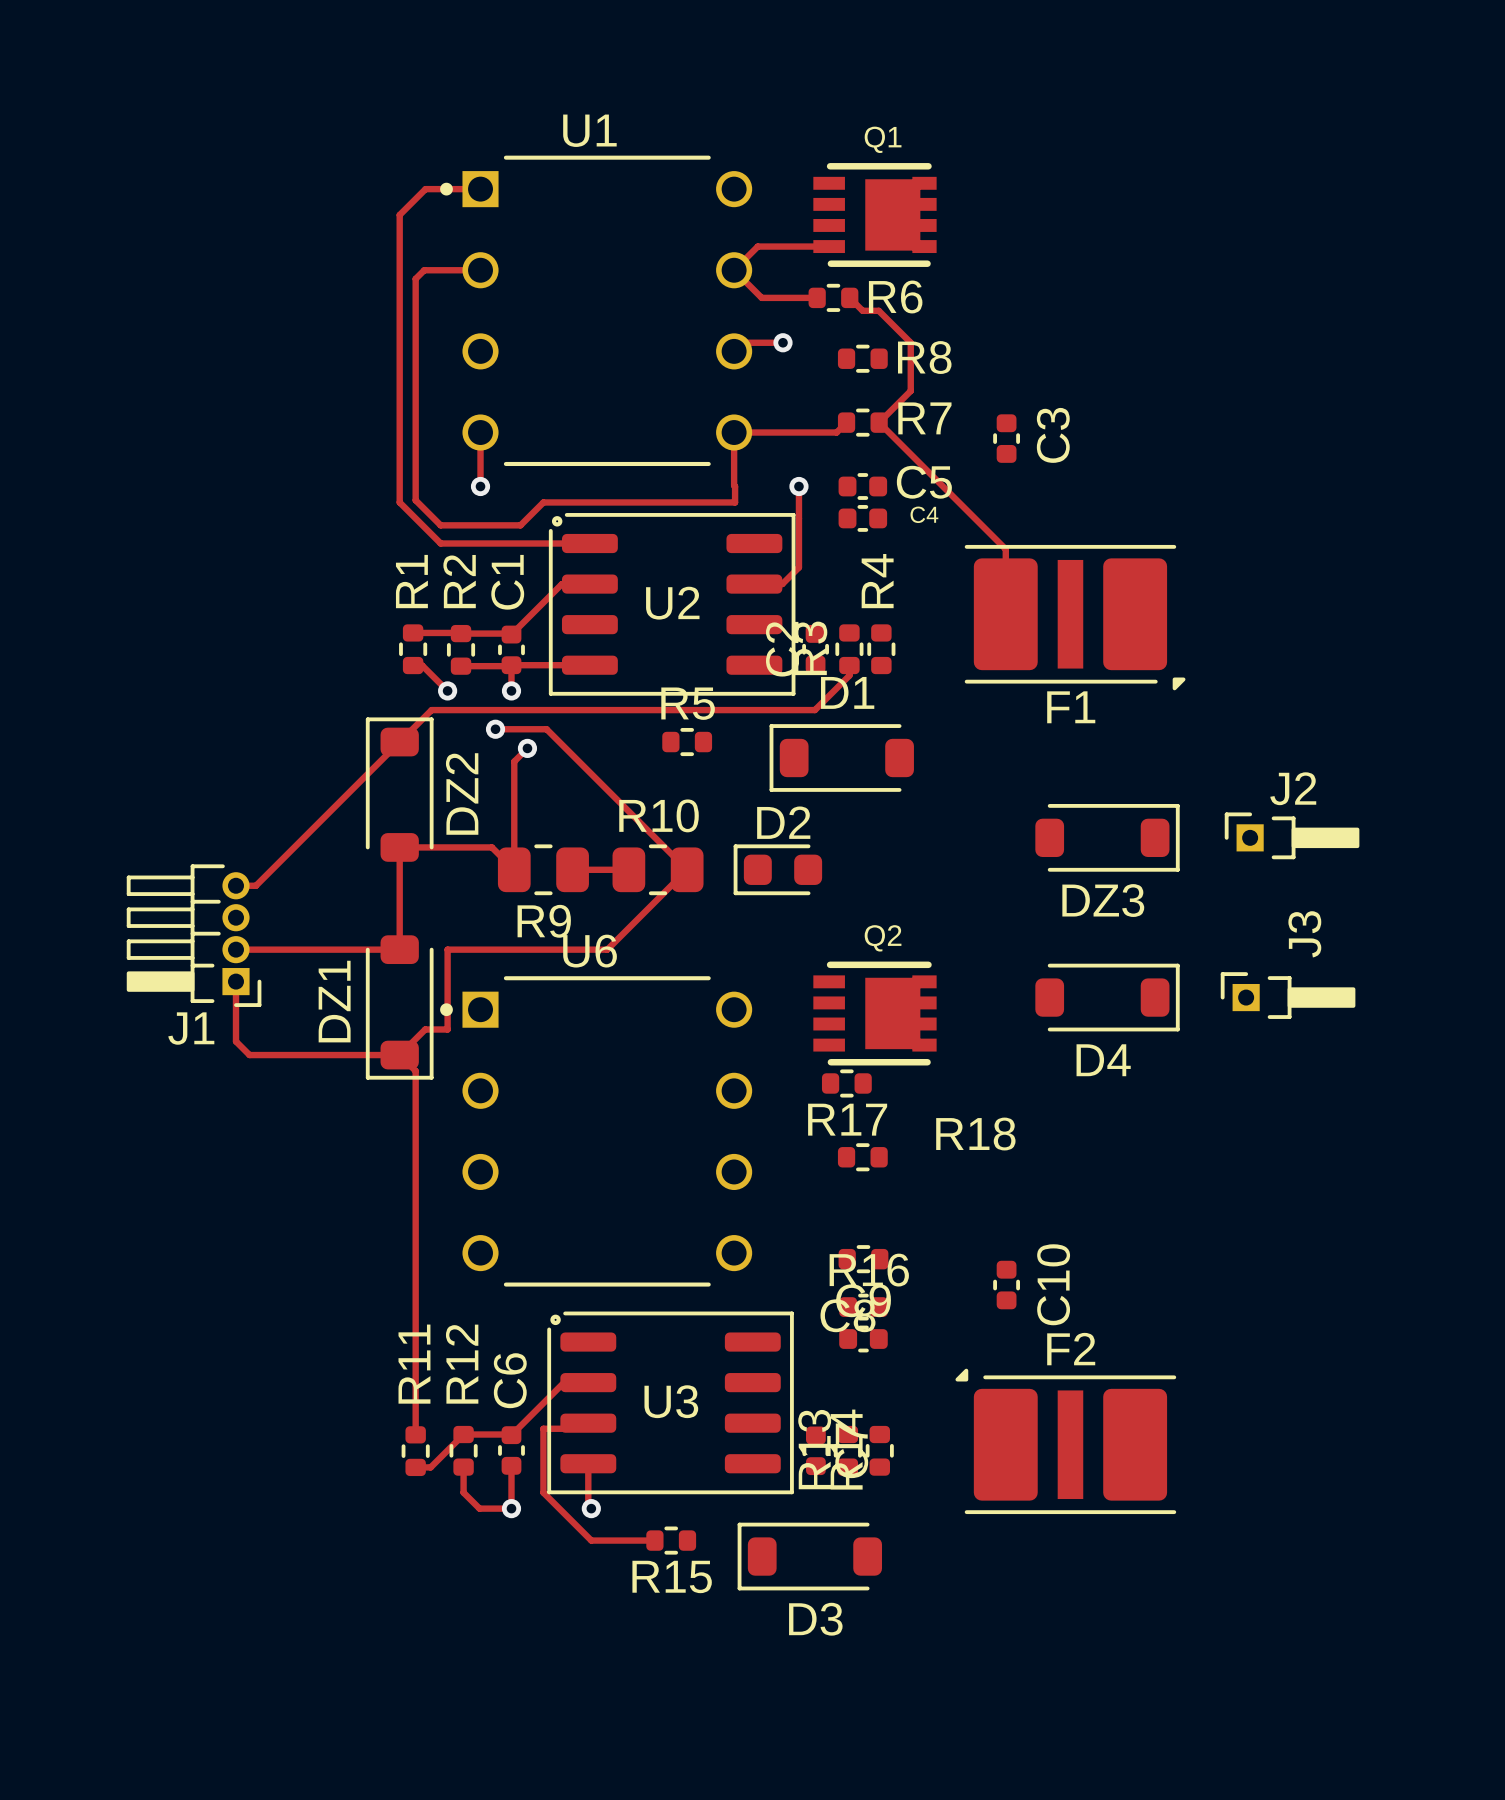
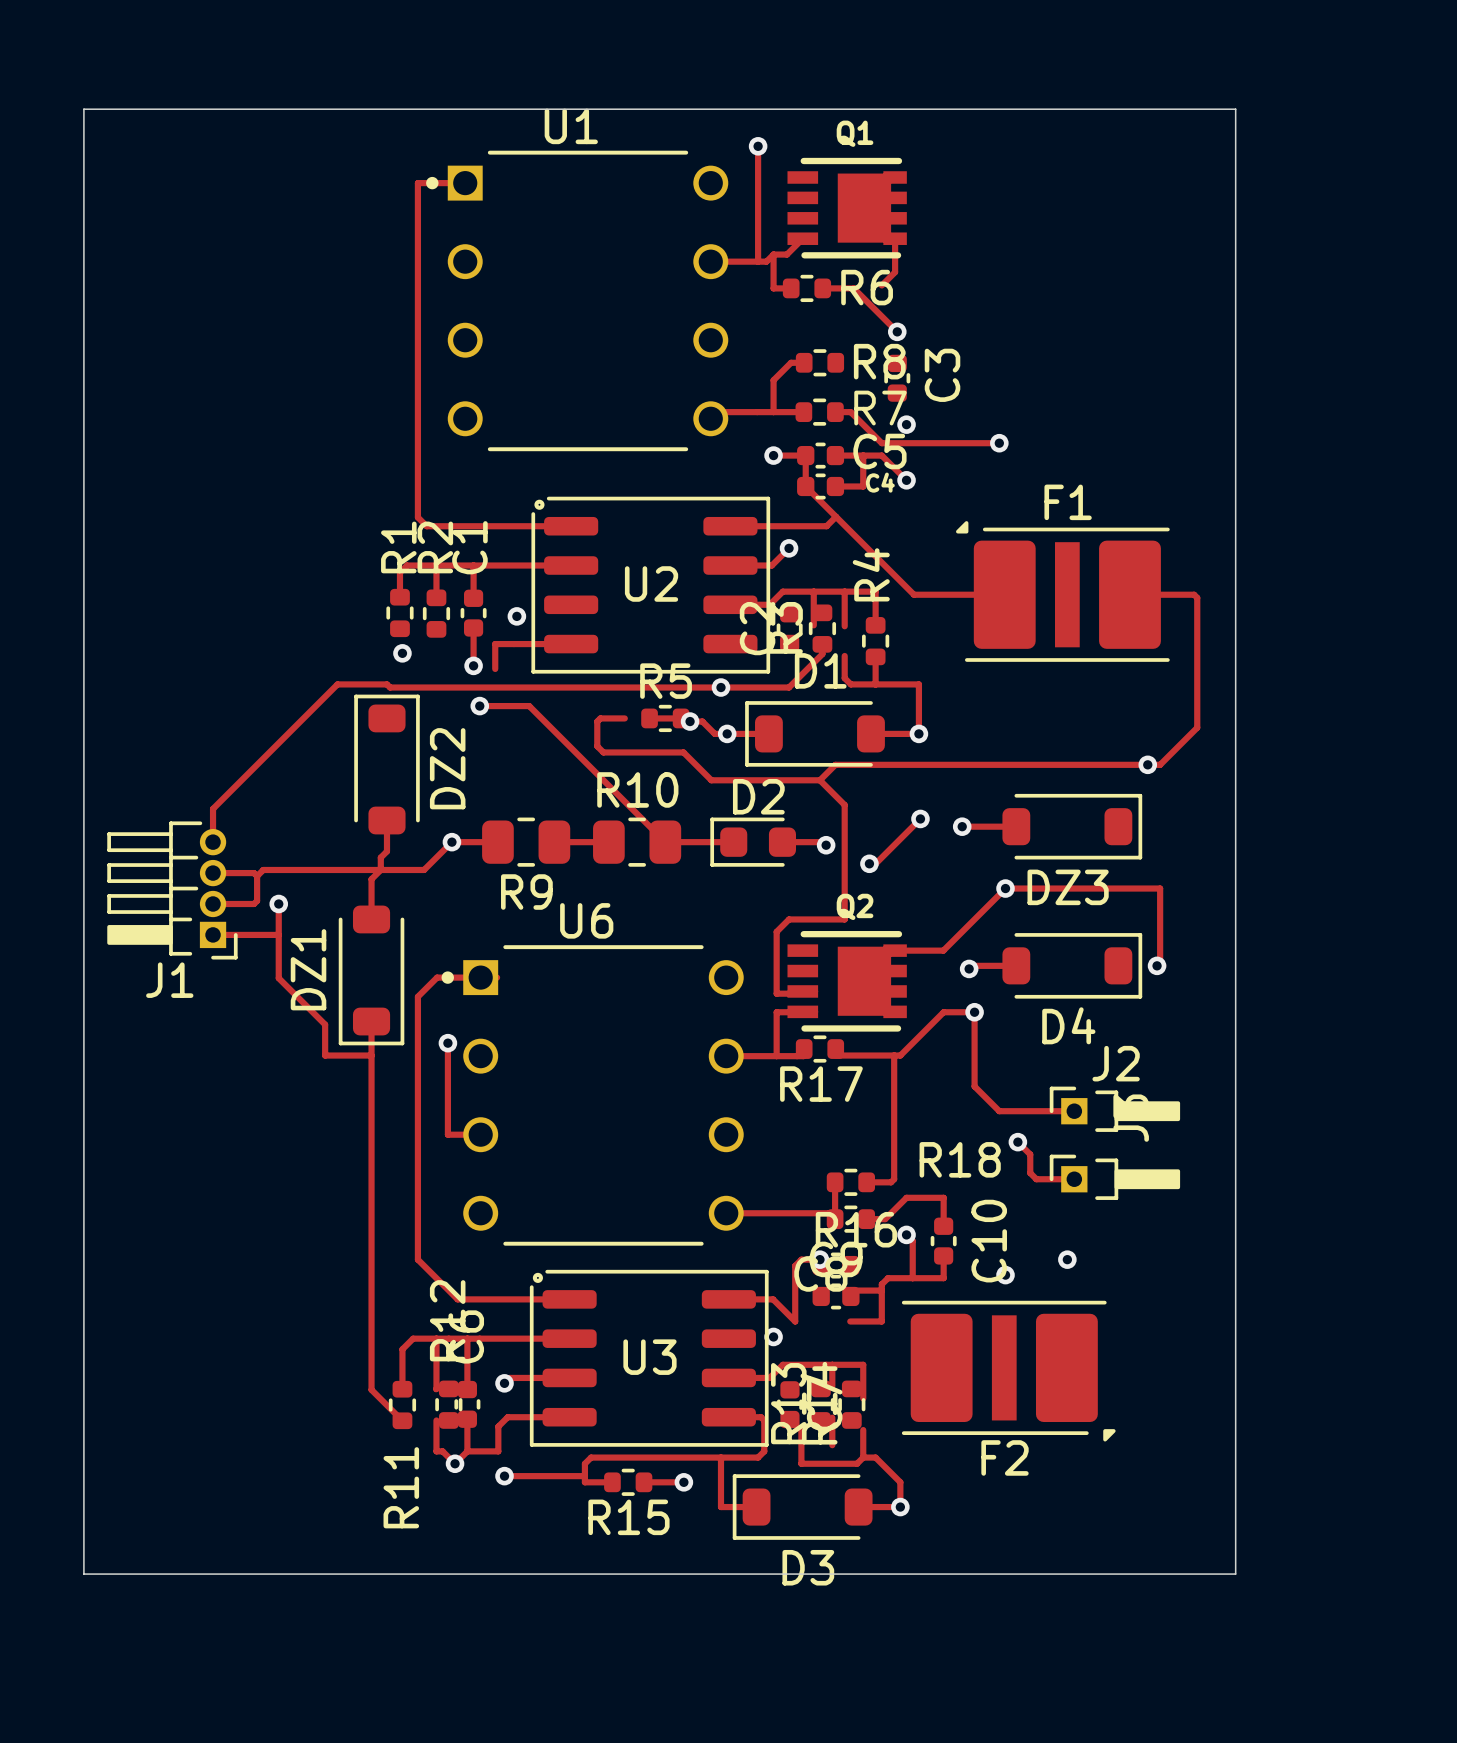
board edge: none -> (83, 109) (1235, 109) (1235, 1574) (83, 1574) (83, 109)
top track: none -> (758, 146) (758, 261)
via: none -> (758, 146)
top track: (431, 189) (425, 189) (399, 214) (399, 502) (431, 534) -> (417, 183) (417, 517)
top track: (829, 246) (757, 246) (734, 270) (761, 297) (798, 297) -> (773, 254) (773, 288)
top track: none -> (802, 238) (786, 254) (773, 254)
top track: none -> (895, 238) (895, 272) (881, 285)
top track: none -> (773, 254) (766, 261) (710, 261)
top track: (480, 270) (424, 270) (415, 278) (415, 500) (440, 525) (520, 525) (543, 502) (735, 502) (734, 432) (836, 432) (846, 422) -> none
top track: (849, 297) (862, 310) (878, 310) (910, 342) (910, 390) (879, 422) (1005, 549) (1005, 614) -> (822, 288) (853, 288) (897, 331)
top track: (782, 342) (742, 342) (734, 351) -> none
via: (782, 342) -> none
via: none -> (897, 331)
R8 position: (862, 358) -> (819, 362)
top track: none -> (804, 362) (791, 362) (773, 380) (773, 412)
R7 position: (862, 422) -> (819, 412)
top track: none -> (717, 412) (803, 412)
top track: none -> (835, 412) (850, 412) (881, 443) (999, 443)
top track: (480, 432) (480, 486) -> none
via: none -> (906, 424)
C3 position: (1006, 438) -> (897, 378)
via: none -> (999, 443)
top track: none -> (773, 455) (805, 455) (805, 486) (913, 594) (1004, 594)
top track: none -> (835, 455) (881, 455) (906, 480)
top track: none -> (863, 455) (863, 486) (835, 486)
via: (480, 486) -> none
top track: (798, 486) (798, 567) (782, 584) -> (789, 548) (771, 565) (757, 565)
via position: (798, 486) -> (773, 455)
C5 position: (862, 486) -> (820, 455)
via: none -> (906, 480)
C4 position: (862, 518) -> (820, 486)
top track: none -> (836, 516) (826, 526) (730, 526)
via: none -> (789, 548)
top track: none -> (436, 565) (436, 597)
top track: none -> (473, 565) (473, 598)
top track: (561, 584) (511, 634) (413, 632) -> (544, 565) (406, 565) (399, 572) (399, 597)
top track: none -> (813, 591) (813, 625)
top track: none -> (844, 591) (844, 626)
top track: none -> (1129, 594) (1194, 594) (1197, 597) (1197, 727) (1160, 764) (835, 764) (819, 780)
F1 rotation: 0° (1075, 617) -> 180° (1062, 591)
top track: none -> (730, 604) (769, 604) (782, 591) (875, 591) (875, 625)
via: none -> (516, 616)
top track: none -> (473, 627) (473, 665)
R1 position: (413, 649) -> (399, 612)
R2 position: (461, 649) -> (436, 613)
C1 position: (511, 649) -> (473, 613)
R4 position: (881, 649) -> (875, 641)
top track: (413, 665) (422, 665) (447, 690) -> none
top track: (511, 665) (461, 666) -> none
via: none -> (402, 653)
top track: none -> (844, 655) (844, 678) (850, 684) (918, 684) (918, 733) (870, 733)
top track: none -> (875, 656) (875, 684)
via: none -> (473, 665)
via: (447, 690) -> none
via: (511, 690) -> none
top track: (431, 710) (255, 885) (236, 885) -> (417, 687) (390, 687) (386, 684) (337, 684) (213, 808) (213, 842)
via: none -> (720, 687)
top track: none -> (624, 718) (600, 718) (597, 721) (597, 746) (603, 752) (683, 752) (711, 780) (819, 780)
top track: none -> (656, 718) (686, 718) (690, 721) (702, 721) (714, 733) (768, 733)
via: none -> (690, 721)
top track: (527, 748) (514, 761) (514, 869) (491, 847) (399, 847) -> none
via: (527, 748) -> none
via: none -> (727, 733)
via: none -> (918, 733)
via: none -> (1147, 764)
top track: none -> (819, 780) (844, 805) (844, 919) (789, 919) (776, 931) (776, 993) (815, 991)
J2 position: (1292, 835) -> (1114, 1109)
DZ3 position: (1107, 837) -> (1072, 826)
top track: none -> (920, 818) (875, 863) (869, 863)
via: none -> (920, 818)
top track: none -> (962, 826) (1016, 826)
via: none -> (962, 826)
via: none -> (451, 842)
top track: none -> (497, 842) (451, 842) (424, 869) (263, 869) (257, 876)
top track: (687, 869) (607, 949) (447, 949) (447, 1029) (425, 1029) (399, 1055) -> (665, 842) (733, 842)
top track: none -> (782, 842) (823, 842) (826, 845)
via: none -> (826, 845)
top track: (399, 879) (399, 949) (236, 949) -> (386, 851) (380, 857) (380, 869) (371, 879) (371, 919)
via: none -> (869, 863)
top track: none -> (213, 873) (254, 873) (257, 876)
top track: none -> (257, 876) (257, 900) (254, 904) (213, 904)
via: none -> (1005, 888)
top track: none -> (278, 904) (278, 978) (325, 1024) (325, 1055) (371, 1055)
via: none -> (278, 904)
J1 position: (194, 935) -> (172, 890)
top track: none -> (213, 934) (278, 934)
top track: (236, 981) (236, 1041) (249, 1055) (399, 1055) -> none
top track: none -> (907, 950) (943, 950) (1005, 888) (1160, 888) (1160, 962) (1163, 965)
J3 position: (1288, 995) -> (1114, 1177)
top track: none -> (1016, 965) (972, 965) (969, 968)
via: none -> (1157, 965)
via: none -> (969, 968)
DZ1 position: (399, 1007) -> (371, 975)
top track: none -> (497, 977) (437, 977) (417, 996) (417, 1259) (457, 1299) (557, 1299)
top track: none -> (789, 1012) (776, 1012) (776, 1056)
via: none -> (974, 1012)
top track: none -> (371, 1021) (371, 1389) (402, 1420)
top track: (399, 1055) (415, 1071) (415, 1393) -> none
top track: none -> (447, 1043) (447, 1134) (480, 1134)
via: none -> (447, 1043)
top track: none -> (804, 1055) (726, 1056)
top track: none -> (835, 1055) (900, 1055) (943, 1012) (974, 1012) (974, 1086) (999, 1111) (1074, 1111)
top track: none -> (894, 1055) (894, 1179) (891, 1182) (866, 1182)
U6 position: (596, 1131) -> (592, 1095)
R18 position: (862, 1157) -> (850, 1182)
top track: none -> (1017, 1142) (1030, 1154) (1030, 1173) (1036, 1179) (1074, 1179)
via: none -> (1017, 1142)
top track: none -> (835, 1182) (835, 1219) (829, 1213) (726, 1213)
R16 position: (863, 1259) -> (850, 1219)
top track: none -> (866, 1219) (885, 1219) (906, 1197) (943, 1197) (943, 1226)
top track: none -> (906, 1234) (912, 1241) (912, 1278)
via: none -> (906, 1234)
C10 position: (1006, 1285) -> (943, 1241)
top track: none -> (943, 1255) (943, 1278) (887, 1278) (881, 1284) (881, 1321) (850, 1321)
via: none -> (819, 1259)
top track: none -> (820, 1260) (801, 1259) (795, 1265) (795, 1321) (773, 1299) (716, 1299)
via: none -> (1067, 1259)
via: none -> (1005, 1275)
top track: none -> (850, 1290) (881, 1290)
R11 name position: R11 (414, 1364) -> R11 (401, 1487)
via: none -> (773, 1336)
top track: none -> (436, 1338) (436, 1388)
top track: none -> (467, 1338) (467, 1389)
top track: (564, 1382) (511, 1435) (463, 1434) (430, 1467) (415, 1467) -> (546, 1338) (413, 1338) (402, 1349)
top track: none -> (832, 1364) (832, 1386)
top track: none -> (557, 1377) (509, 1377) (504, 1383)
top track: (588, 1423) (580, 1423) (574, 1428) (543, 1428) (543, 1492) (591, 1540) (654, 1540) -> none
top track: none -> (716, 1377) (769, 1377) (782, 1364) (863, 1364) (863, 1398)
via: none -> (504, 1383)
F2 rotation: 0° (1065, 1441) -> 180° (1008, 1371)
C6 position: (511, 1450) -> (467, 1404)
top track: none -> (557, 1417) (507, 1417) (498, 1426) (498, 1451) (467, 1451)
top track: none -> (716, 1417) (761, 1417) (764, 1420) (764, 1451) (758, 1457) (591, 1457) (584, 1463) (584, 1482) (612, 1482)
top track: none -> (832, 1417) (832, 1445)
top track: none -> (467, 1419) (467, 1451)
top track: (586, 1465) (588, 1463) (588, 1505) (591, 1508) -> none
top track: none -> (436, 1420) (436, 1451) (442, 1451) (455, 1463) (467, 1451)
top track: (463, 1467) (463, 1492) (479, 1508) (511, 1508) (511, 1465) (510, 1467) -> none
top track: none -> (801, 1429) (801, 1463) (857, 1463) (863, 1457)
top track: none -> (863, 1430) (863, 1457)
top track: none -> (720, 1457) (720, 1507) (756, 1507)
top track: none -> (863, 1457) (875, 1457) (900, 1482) (900, 1507) (858, 1507)
via position: (511, 1508) -> (504, 1476)
via: (591, 1508) -> none
via: none -> (455, 1463)
top track: none -> (504, 1476) (584, 1476)
top track: none -> (643, 1482) (683, 1482)
via: none -> (683, 1482)
R15 position: (671, 1540) -> (628, 1482)
D3 position: (809, 1556) -> (802, 1507)
via: none -> (900, 1507)

